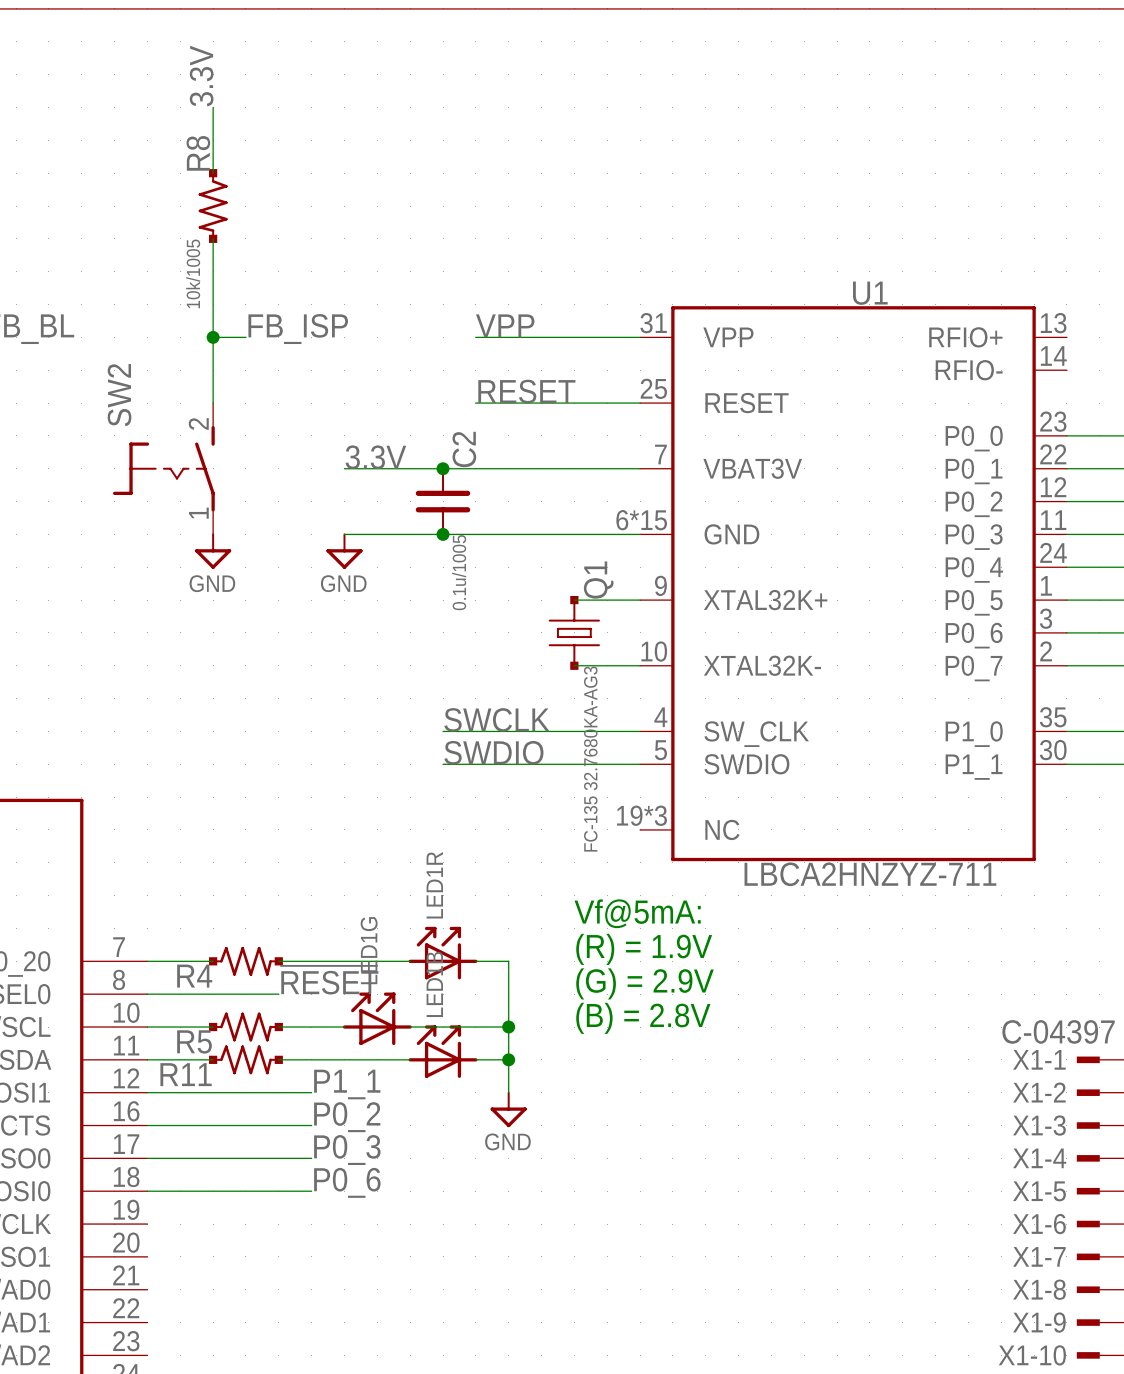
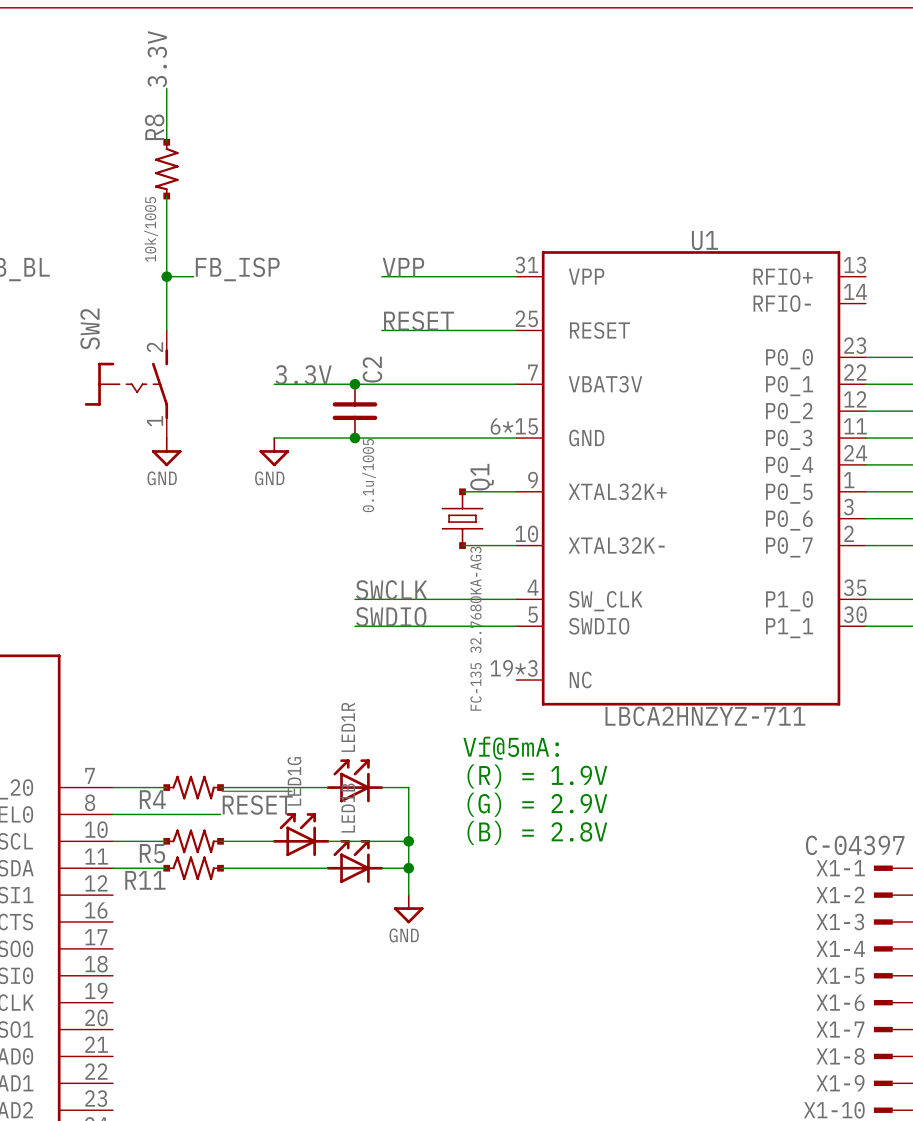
label: P1_1 (347, 1084) -> none
wire: (147, 1092) (311, 1092) -> none
label: P0_2 (347, 1117) -> none
wire: (147, 1125) (311, 1125) -> none
label: P0_3 (347, 1150) -> none
wire: (147, 1158) (311, 1158) -> none
label: P0_6 (347, 1182) -> none
wire: (147, 1191) (311, 1191) -> none

